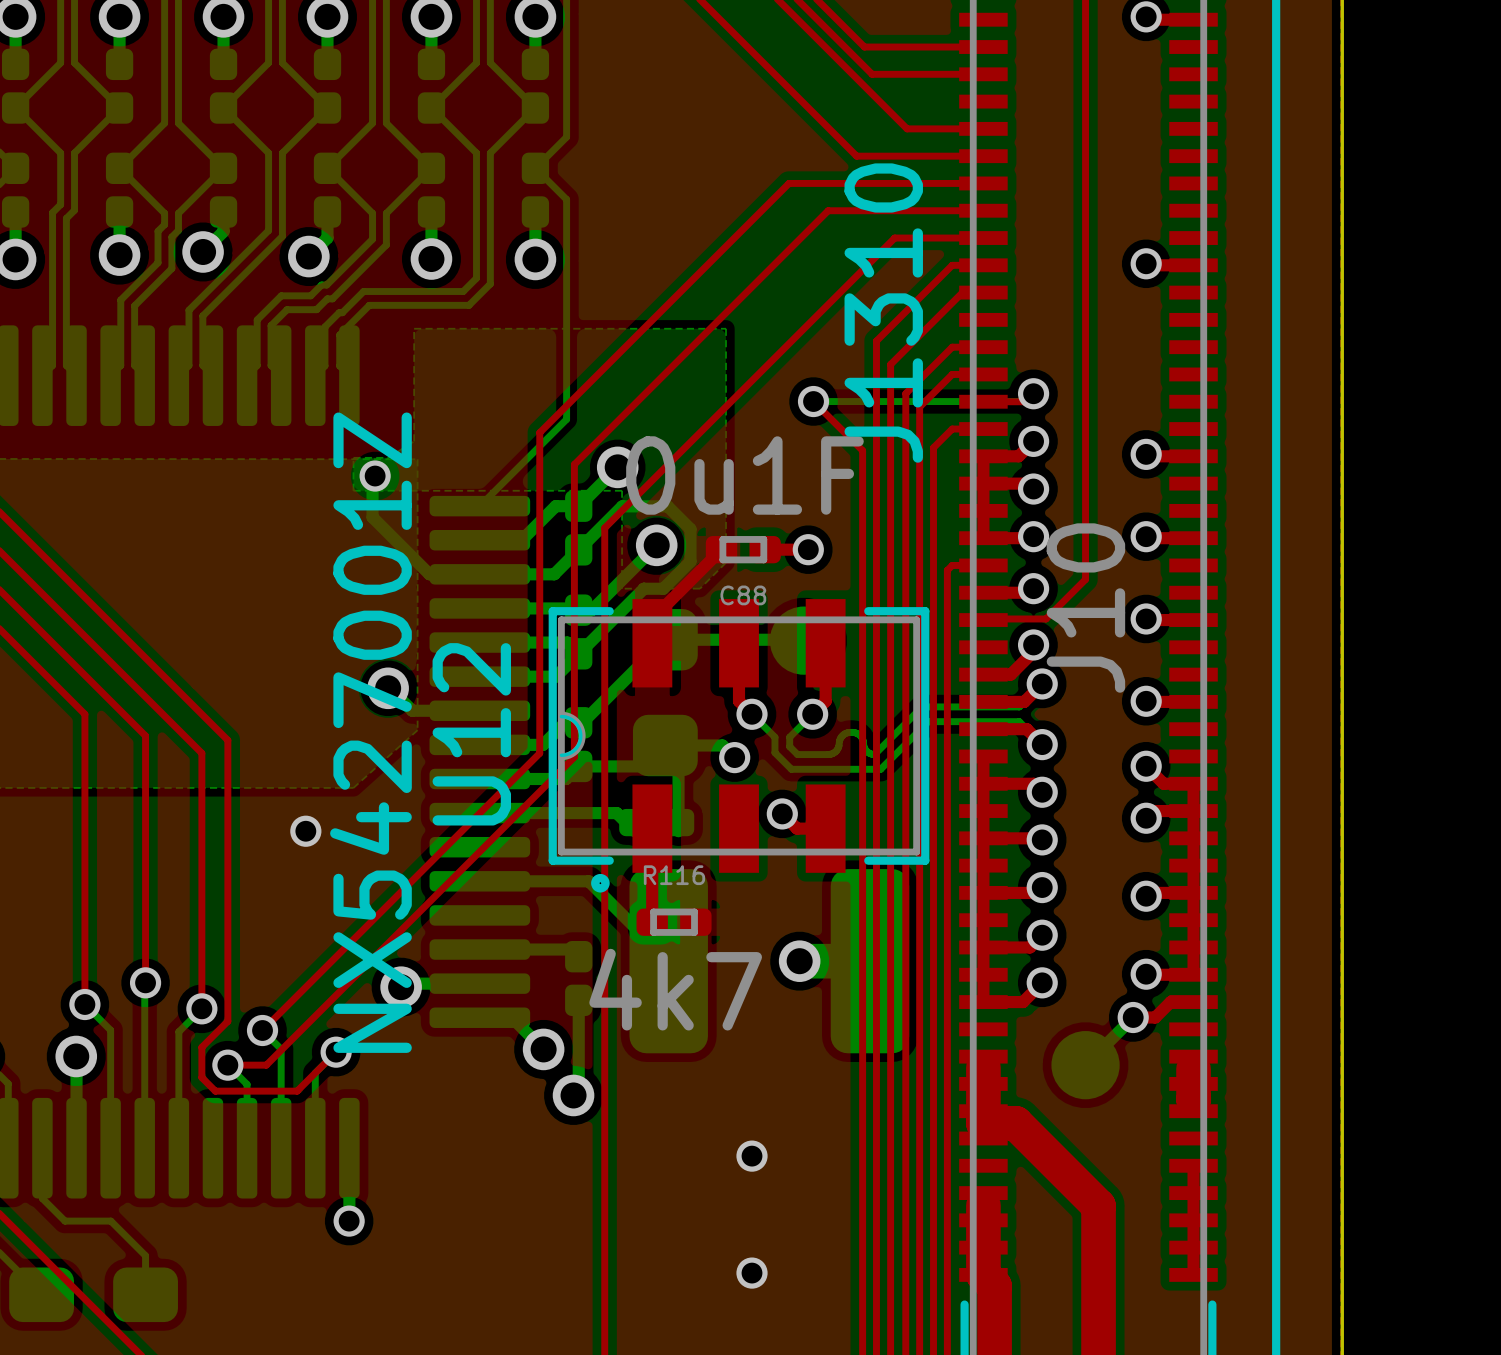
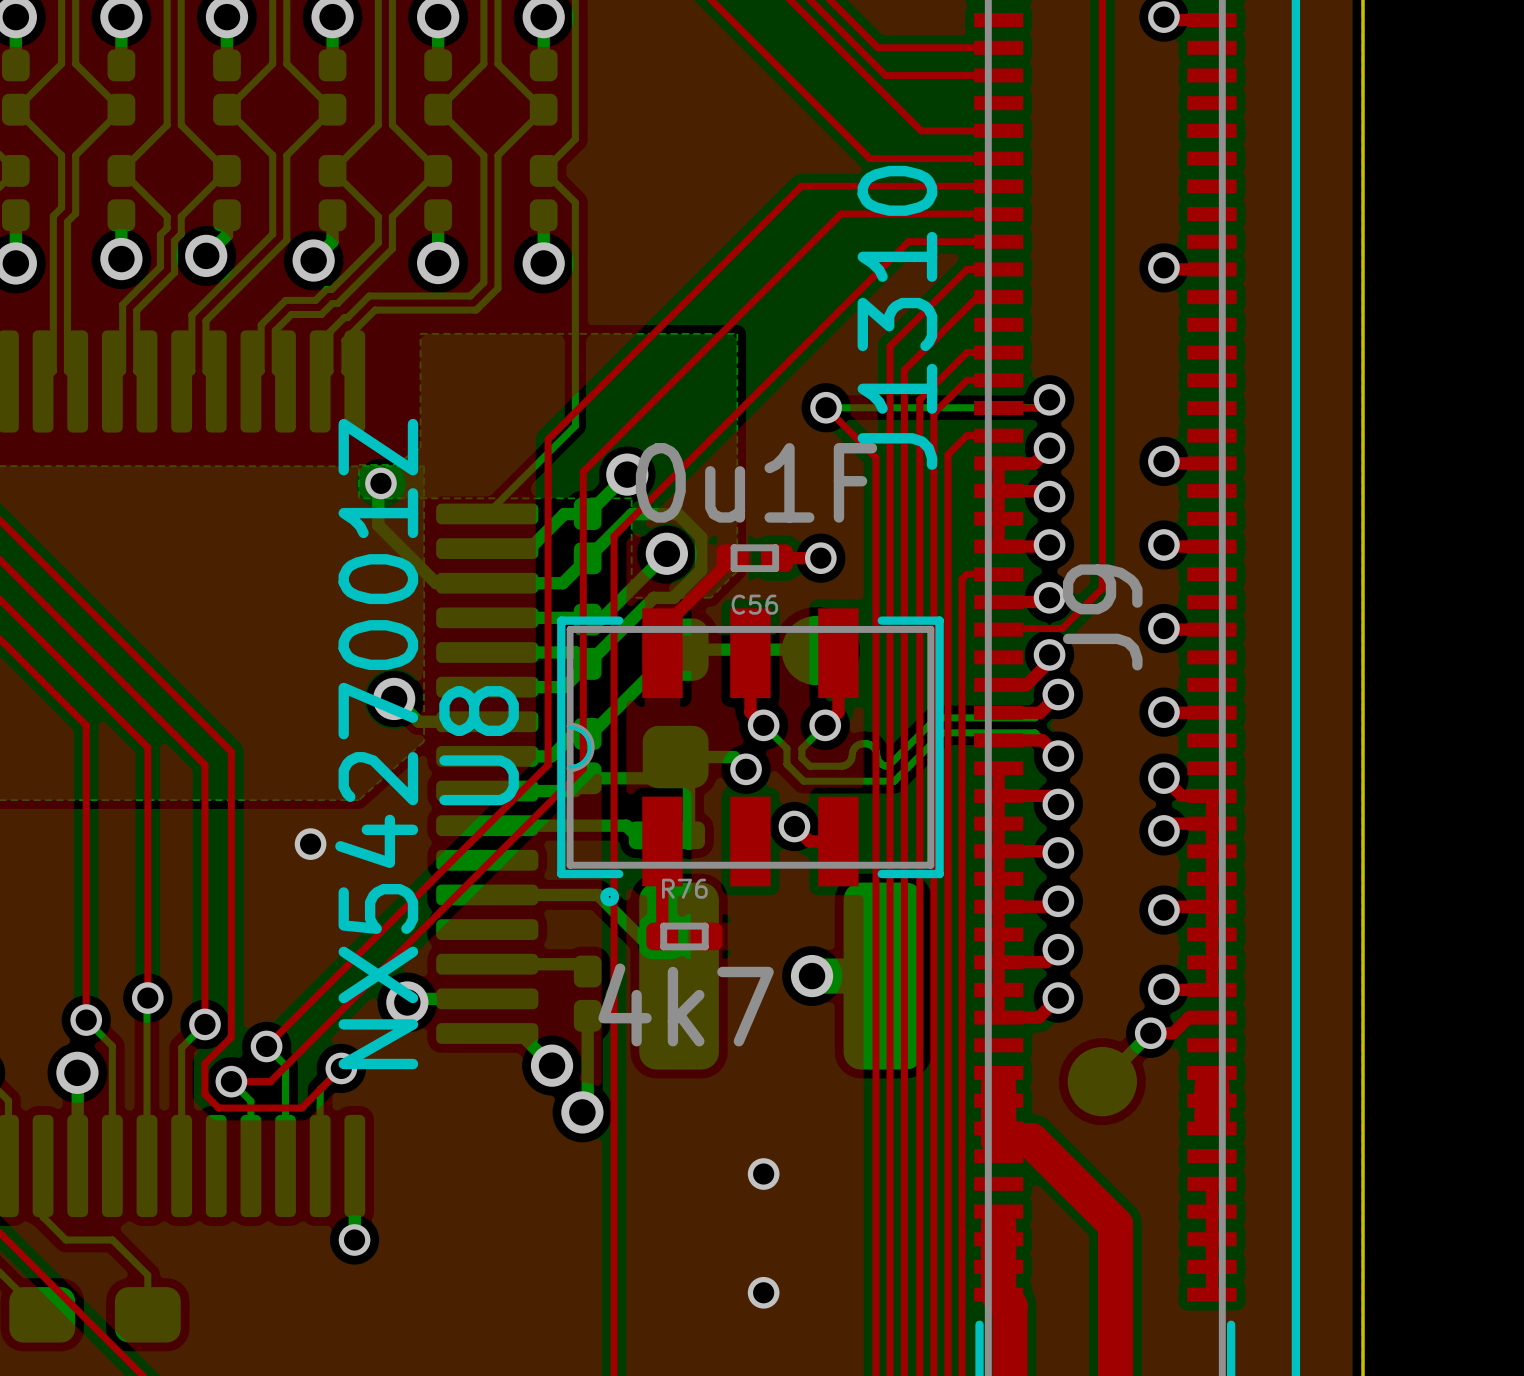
C88 name: C88 (743, 595) -> C56 (754, 604)
J10 name: J10 (1085, 608) -> J9 (1102, 617)
U12 name: U12 (471, 734) -> U8 (479, 745)
R116 name: R116 (674, 875) -> R76 (684, 888)

